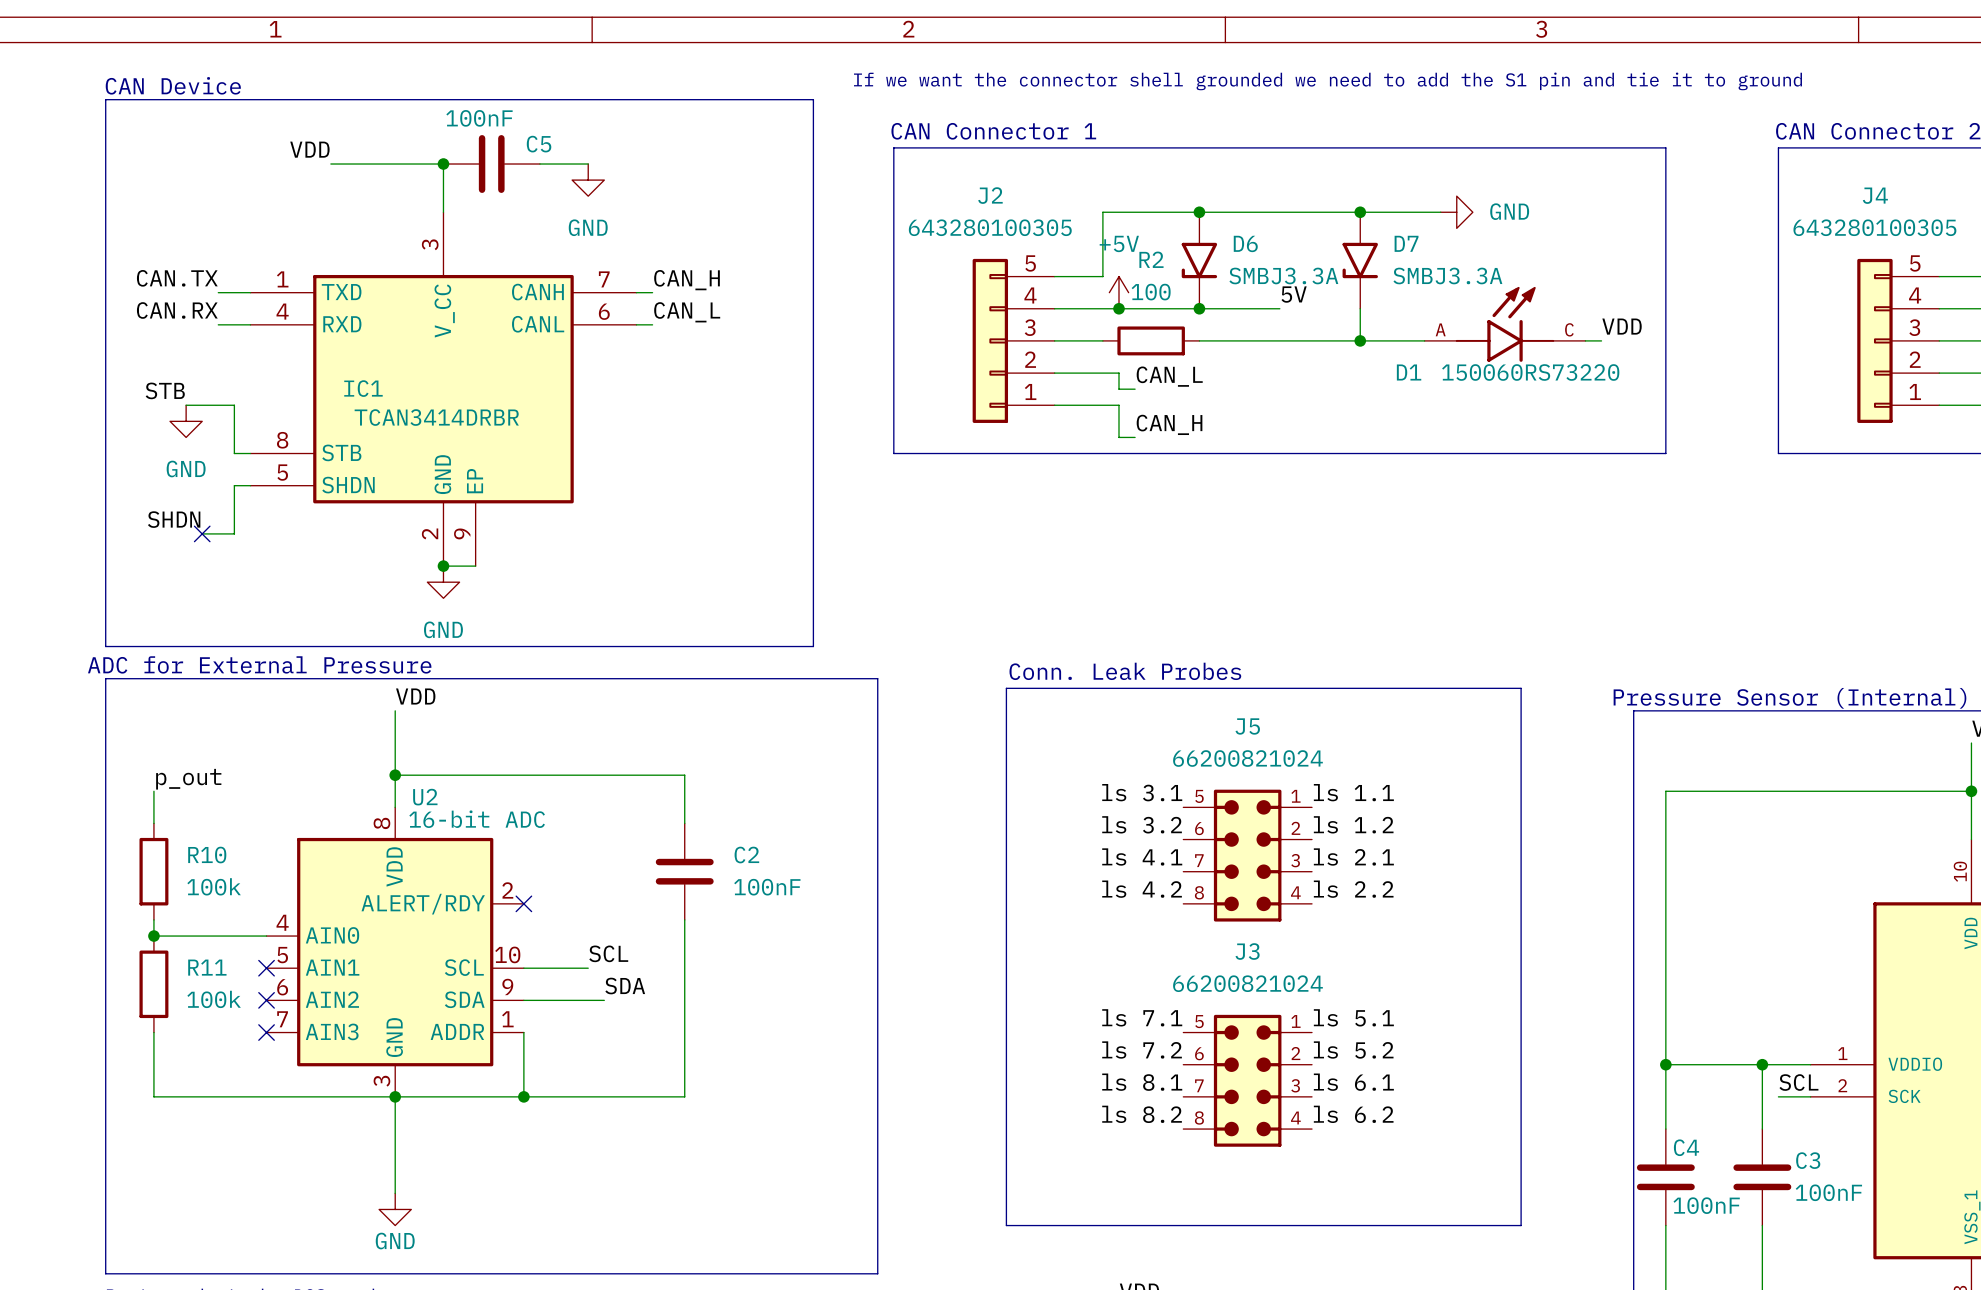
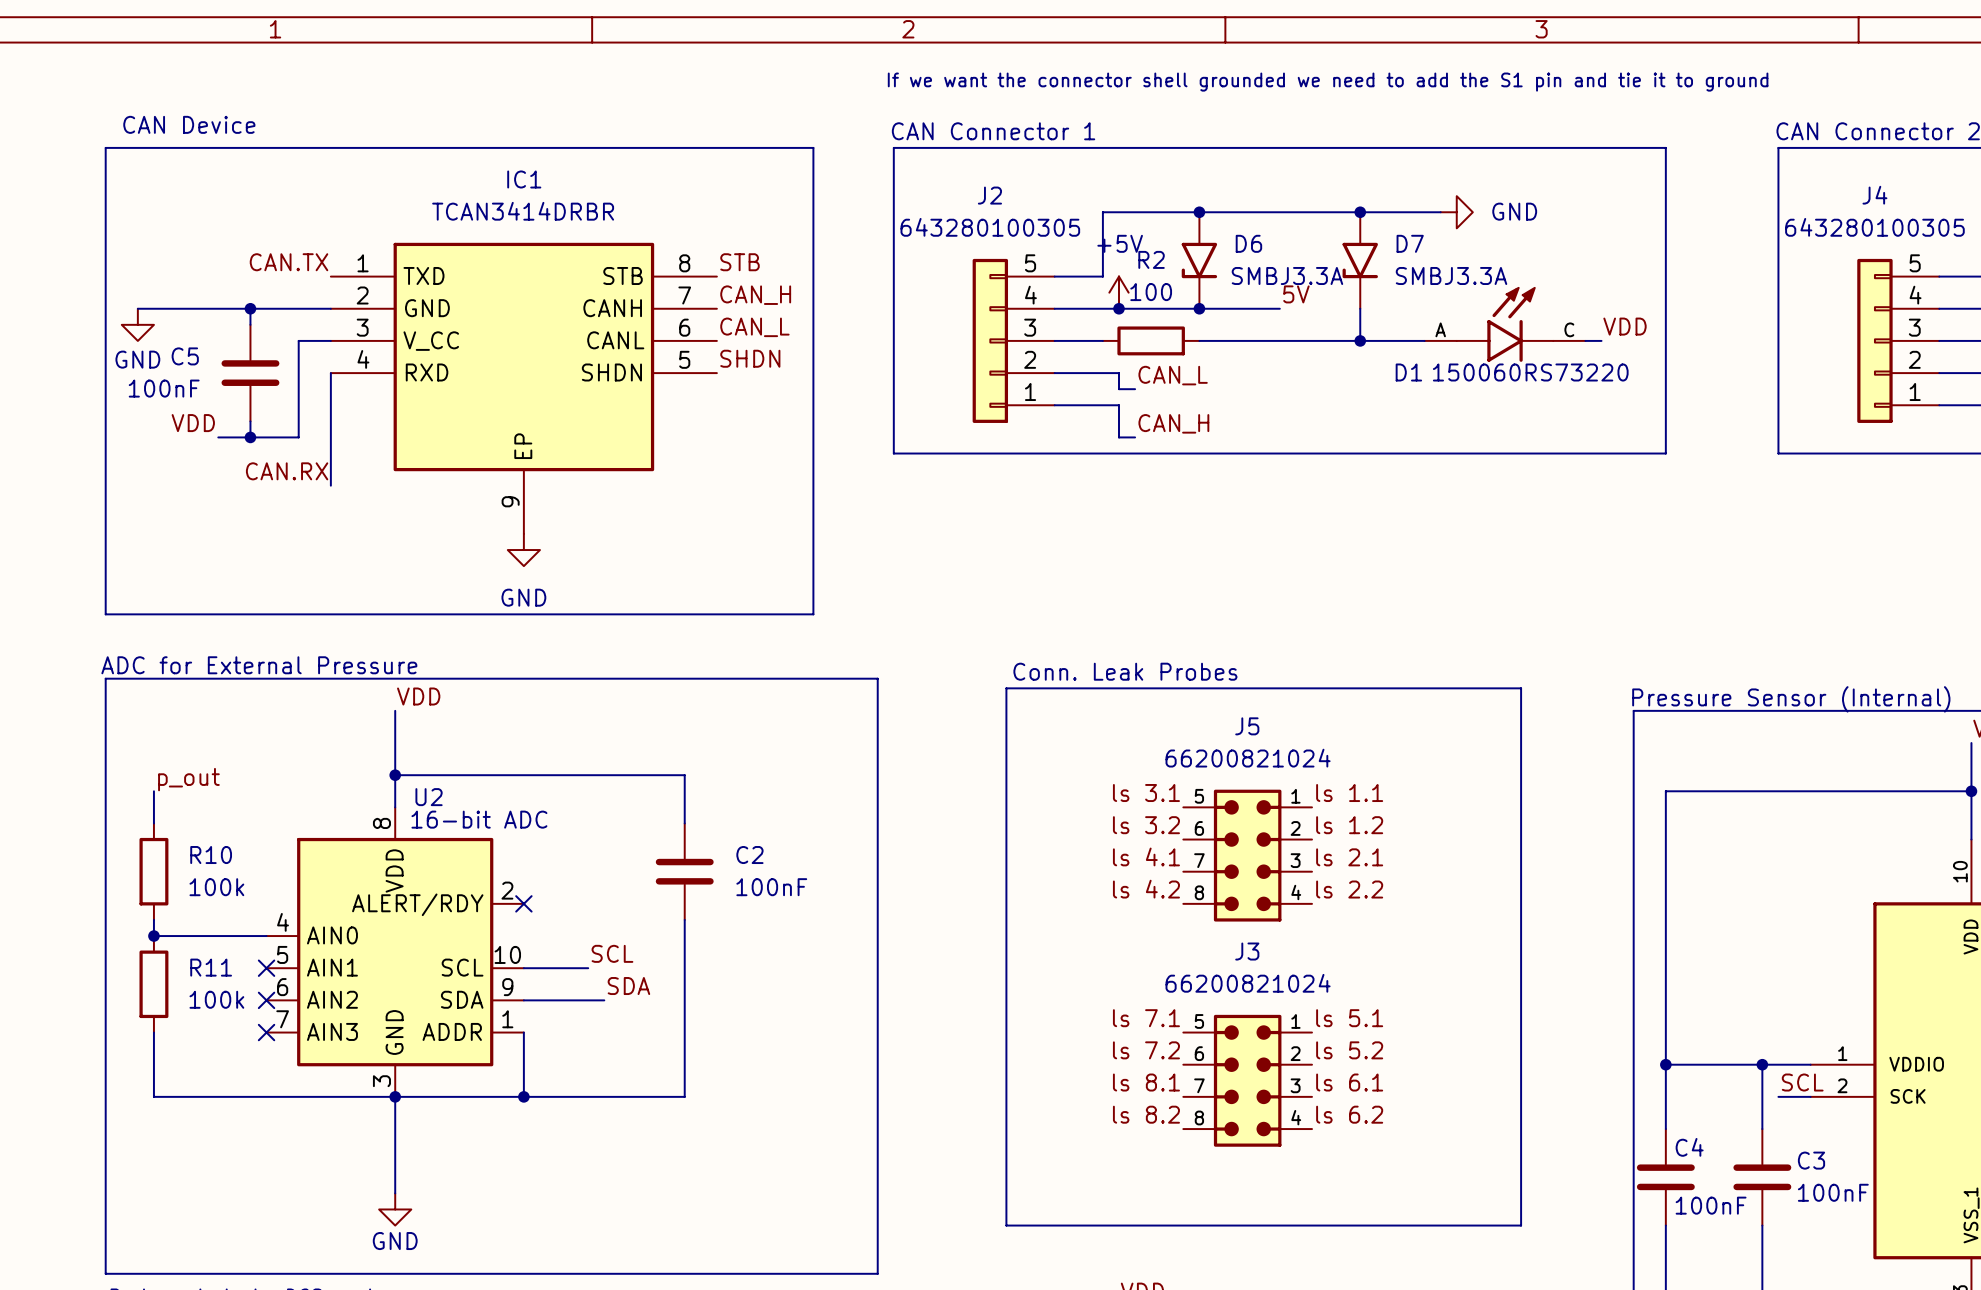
text position: CAN Device (173, 85) -> CAN Device (189, 124)
C5 value position: 100nF (479, 118) -> 100nF (164, 388)
C5 name position: C5 (539, 144) -> C5 (185, 356)
line: (105, 147) (105, 99) (813, 99) (813, 147) -> (105, 147) (813, 147)
label position: VDD (309, 149) -> VDD (193, 423)
wire: (330, 164) (443, 164) (443, 212) -> none
junction: (443, 164) -> none
C5 rotation: 0° (491, 164) -> 90° clockwise (250, 373)
C5 position: (491, 164) -> (250, 373)
wire: (539, 164) (588, 164) -> none
power symbol: GND (588, 180) -> none
IC1 symbol: [250, 212, 637, 567] -> [330, 242, 717, 534]
label: none -> STB (739, 262)
label position: CAN.TX (177, 278) -> CAN.TX (289, 262)
label position: CAN_H (687, 280) -> CAN_H (755, 295)
wire: (218, 292) (250, 292) -> none
wire: none -> (137, 308) (330, 308)
junction: none -> (250, 308)
label position: CAN.RX (177, 310) -> CAN.RX (287, 471)
label position: CAN_L (687, 312) -> CAN_L (754, 327)
wire: (218, 324) (250, 324) -> (250, 308) (250, 324)
wire: none -> (330, 340) (298, 340) (298, 437) (218, 437)
label: none -> SHDN (750, 358)
IC1 name position: IC1 (363, 388) -> IC1 (524, 179)
label: STB (165, 390) -> none
wire: (186, 405) (234, 405) (234, 453) (250, 453) -> none
IC1 value position: TCAN3414DRBR (436, 417) -> TCAN3414DRBR (523, 211)
power symbol position: GND (186, 421) -> GND (137, 324)
wire: none -> (250, 421) (250, 437)
junction: none -> (250, 437)
power symbol text position: GND (186, 469) -> GND (137, 359)
wire: (250, 485) (234, 485) (234, 533) (202, 533) -> none
label: SHDN (174, 519) -> none
no-connect mark: (202, 533) -> none
wire: (443, 566) (475, 566) -> none
junction: (443, 566) -> none
power symbol position: GND (443, 582) -> GND (523, 550)
line: (105, 614) (105, 646) (813, 646) (813, 614) -> (105, 614) (813, 614)

